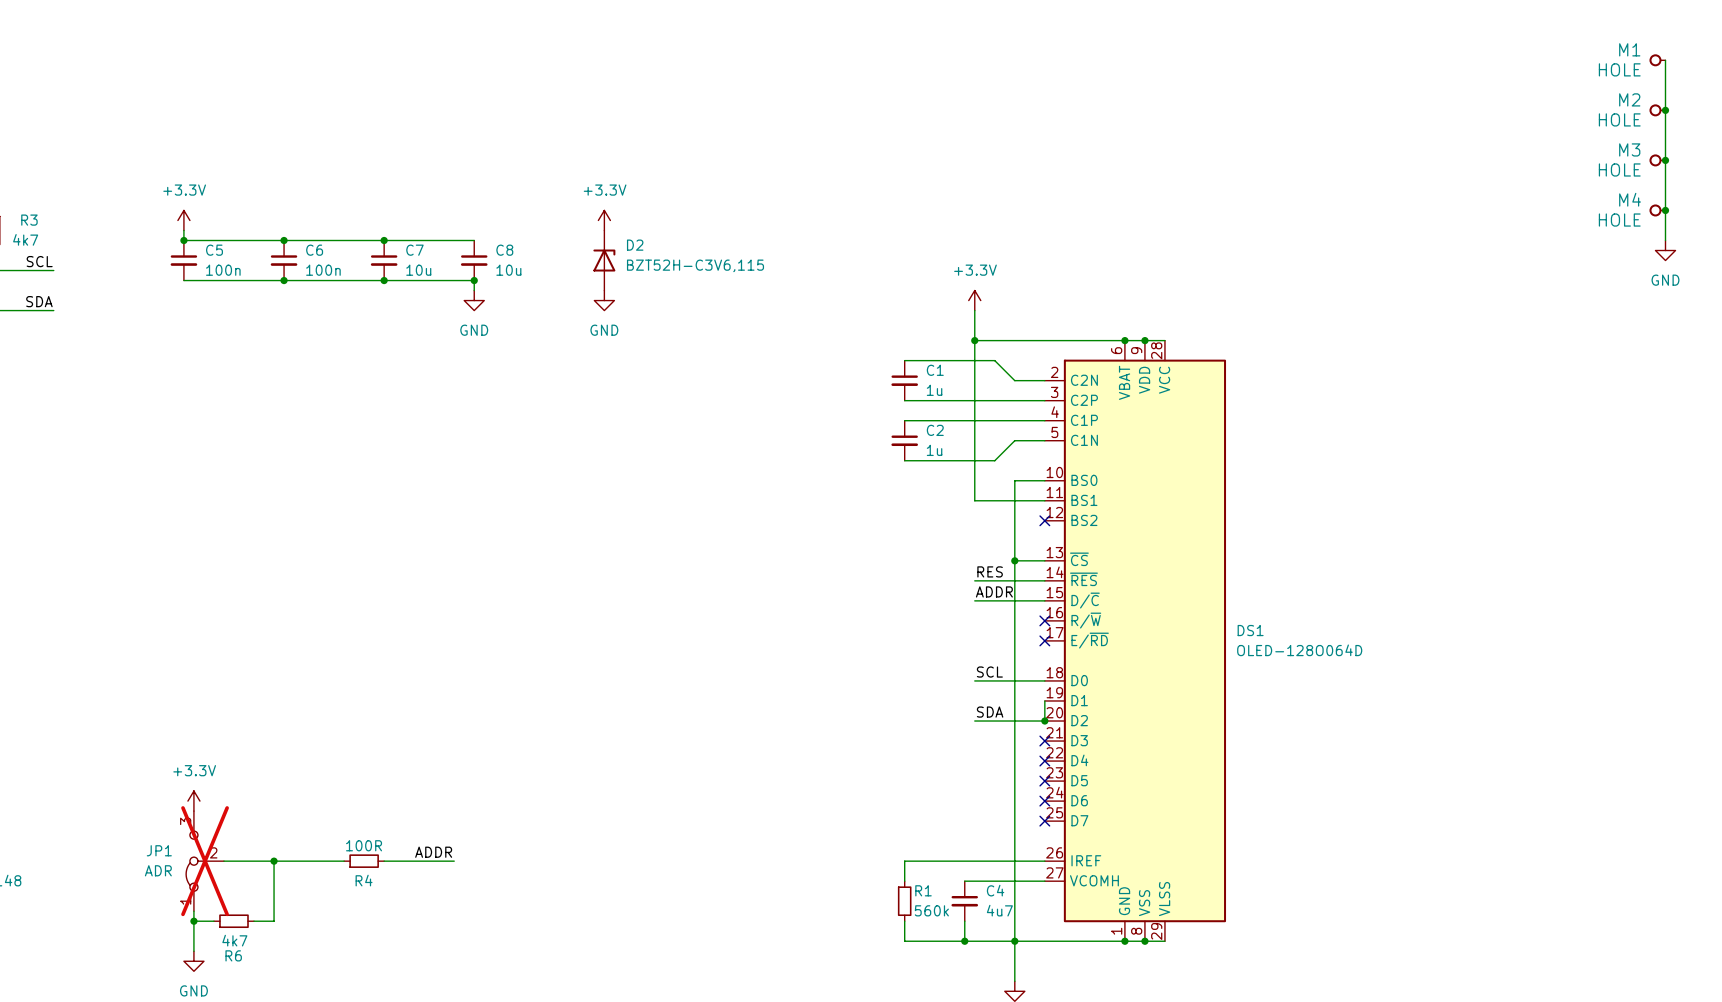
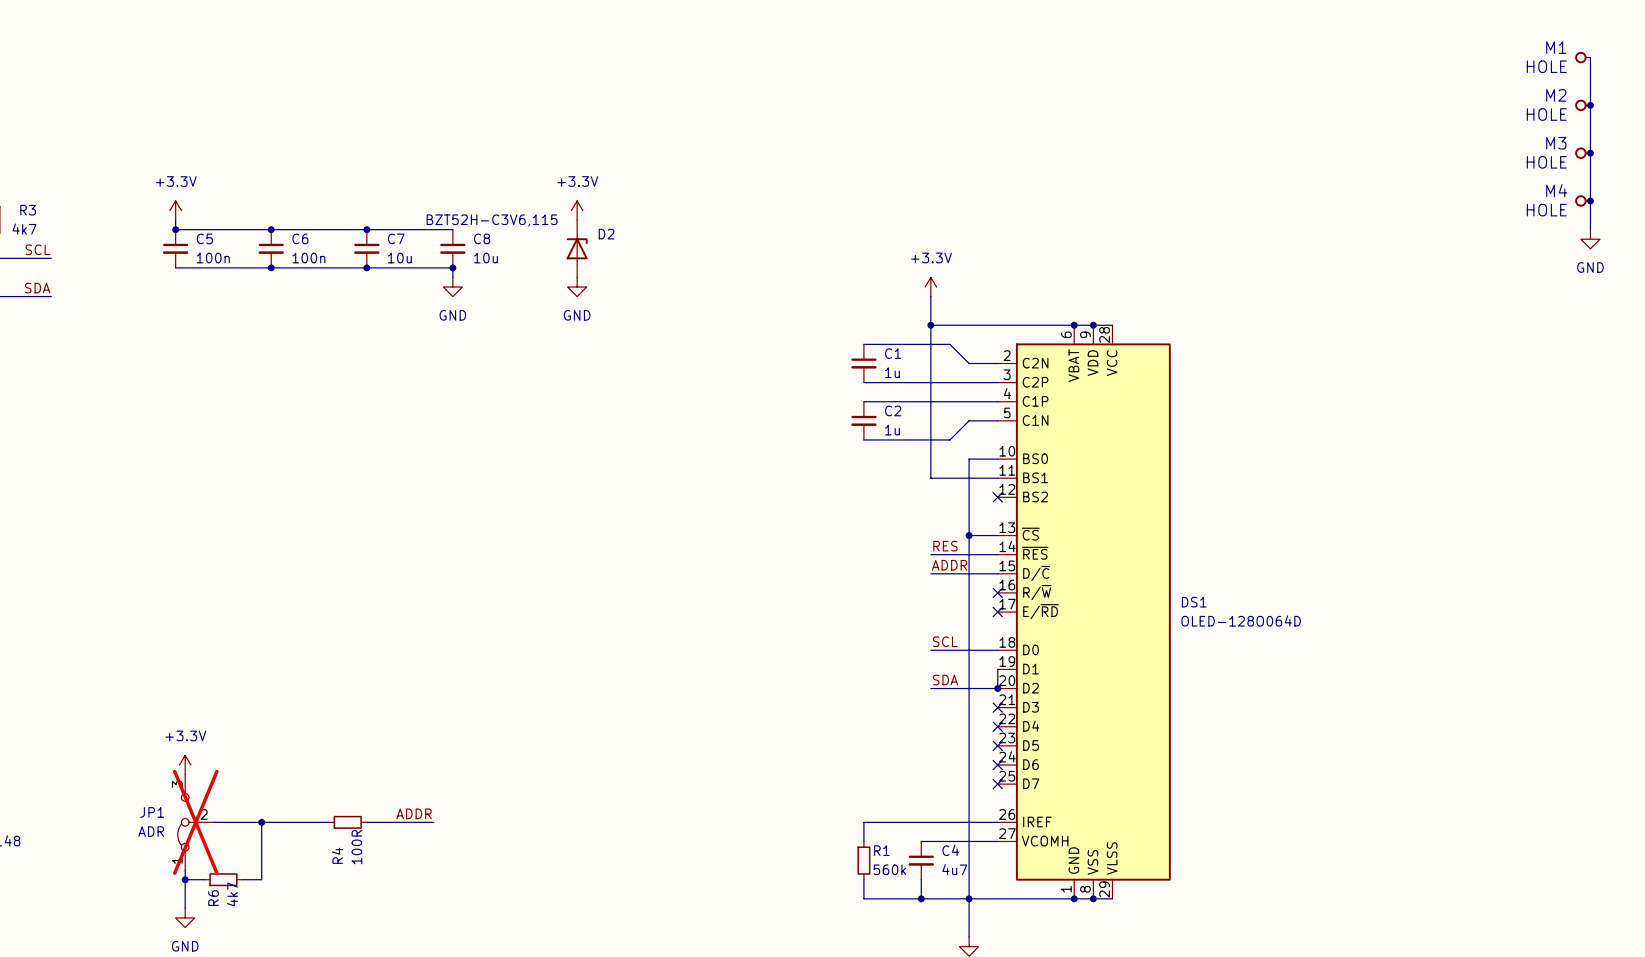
D2 value position: BZT52H-C3V6,115 (695, 265) -> BZT52H-C3V6,115 (492, 220)
R4 value rotation: 0° (364, 845) -> 90° counterclockwise (356, 847)
R4 name rotation: 0° (364, 880) -> 90° counterclockwise (337, 855)
R6 value rotation: 0° (234, 940) -> 90° counterclockwise (232, 894)
R6 name rotation: 0° (233, 955) -> 90° counterclockwise (213, 898)

